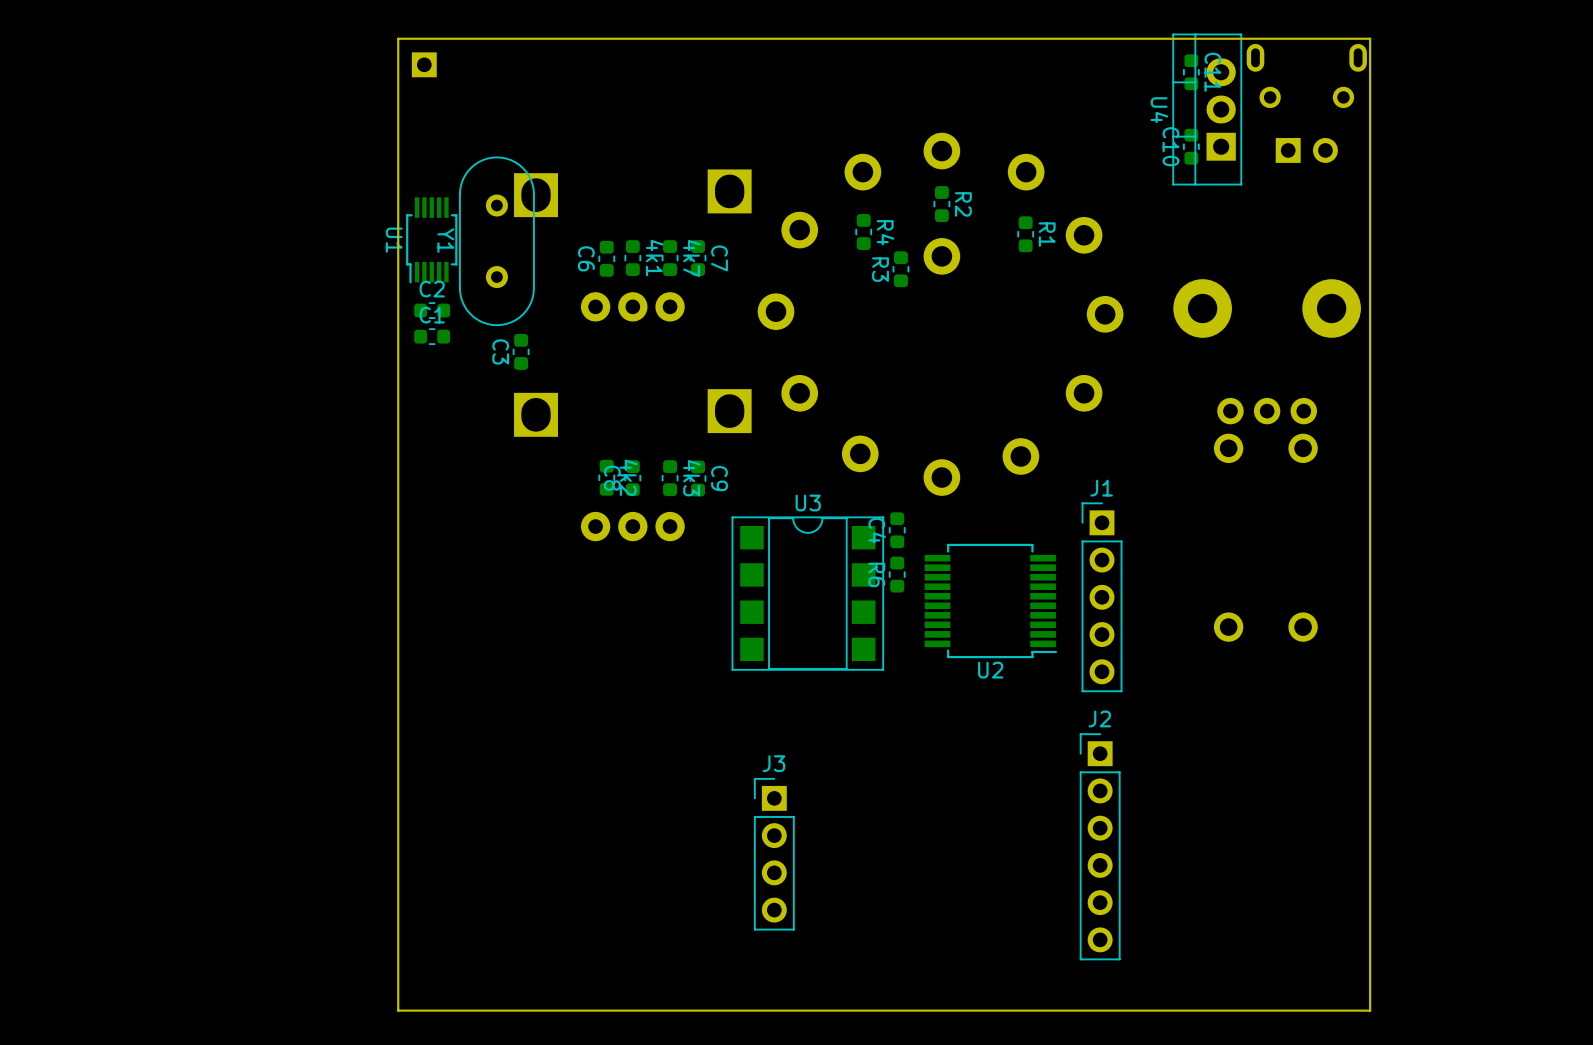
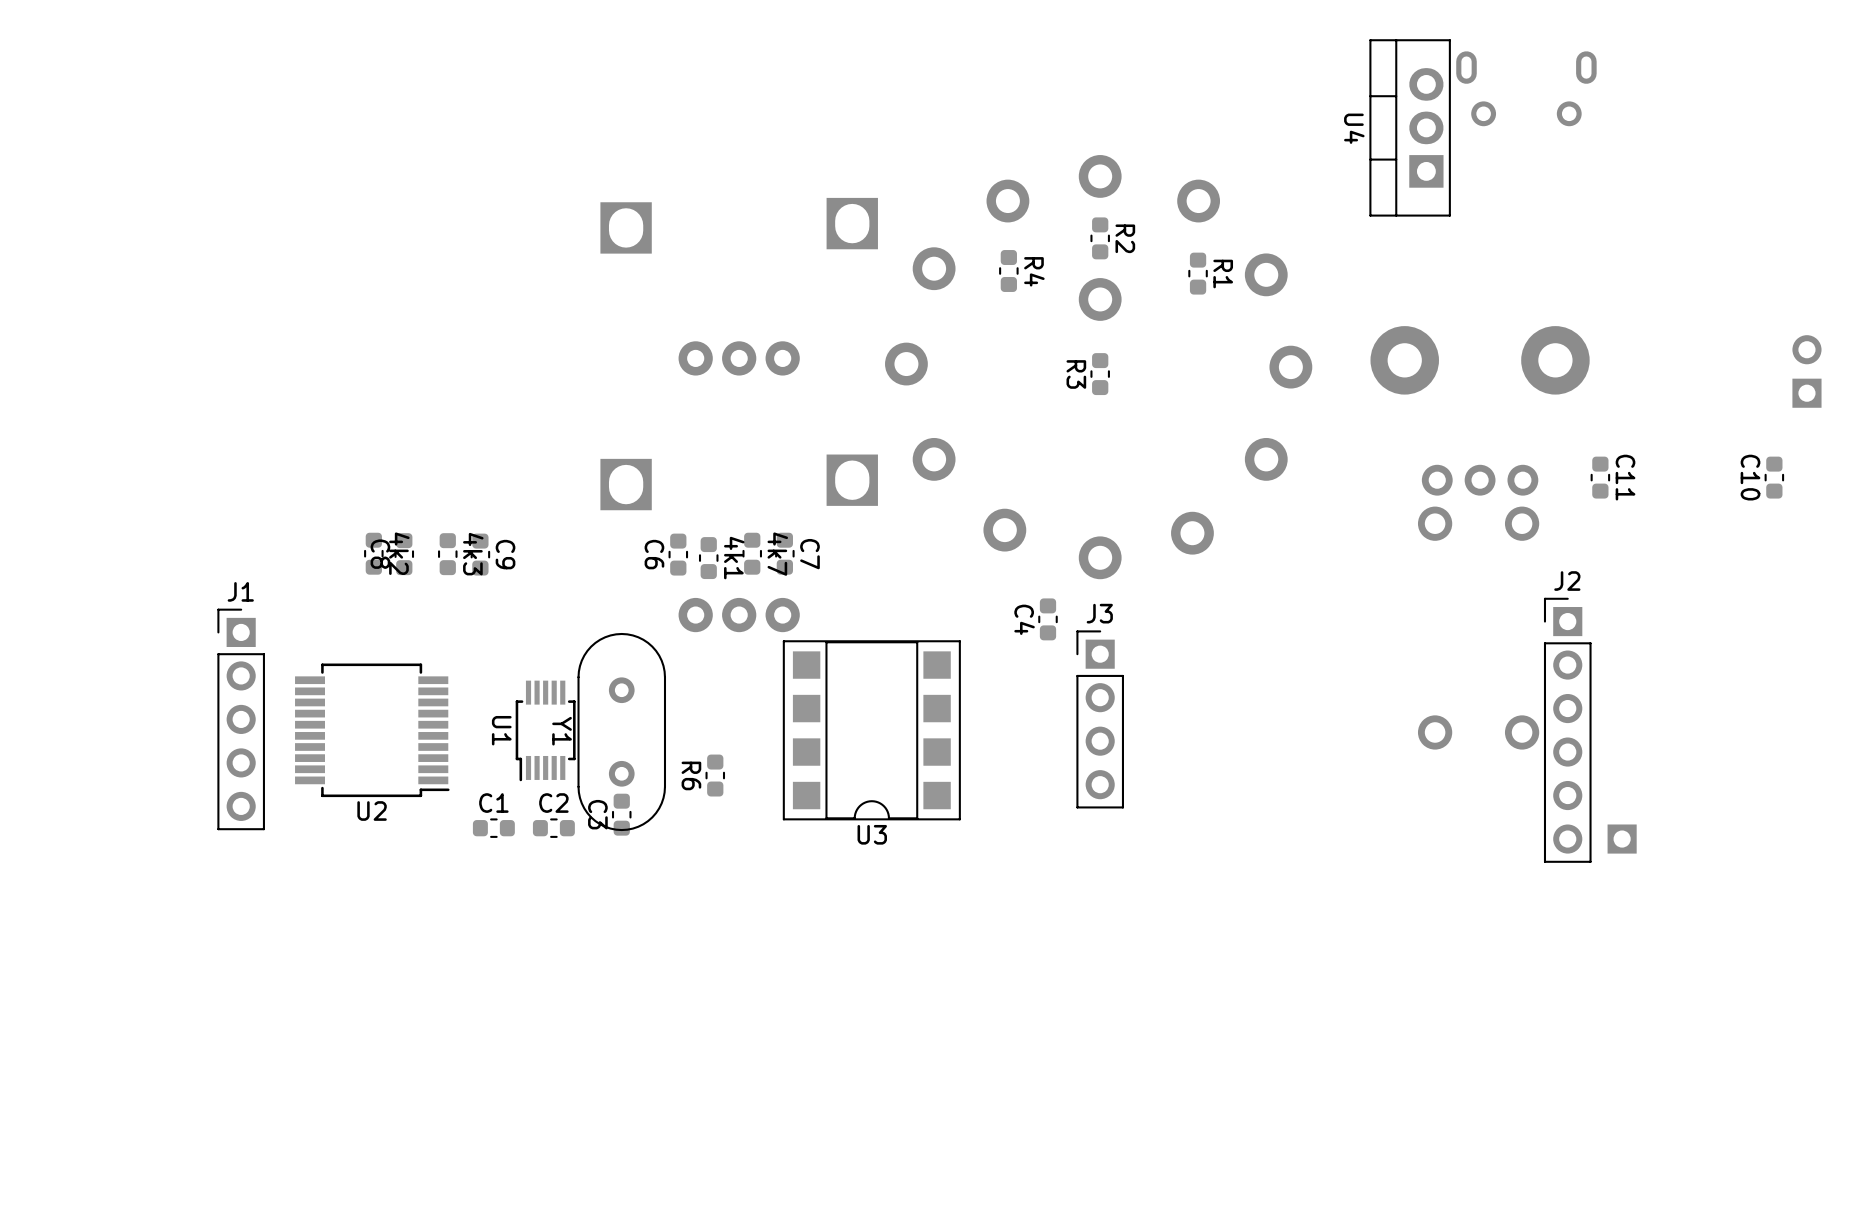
board edge: (1370, 38) (1370, 1010) (398, 1010) (398, 38) (1370, 38) -> none
part: (424, 64) -> none
C11 position: (1191, 72) -> (1600, 477)
C10 position: (1191, 146) -> (1774, 477)
part rotation: 0° (1306, 150) -> 90° counterclockwise (1806, 371)
part position: (1306, 150) -> (1806, 371)
U1 position: (431, 240) -> (545, 730)
Y1 position: (496, 241) -> (621, 732)
C6 position: (606, 258) -> (678, 554)
4k1: (632, 258) -> none
4k7 position: (670, 258) -> (752, 553)
C7 position: (698, 258) -> (784, 553)
R3 position: (900, 269) -> (1100, 374)
C2 position: (432, 310) -> (553, 828)
C1 position: (432, 336) -> (493, 828)
C3 position: (521, 351) -> (621, 814)
4k2: none -> (373, 553)
4k2 name: 4k2 (628, 477) -> 4k1 (734, 558)
C8 position: (632, 478) -> (404, 554)
4k3 position: (670, 478) -> (447, 554)
C9 position: (698, 478) -> (480, 554)
R6 position: (897, 574) -> (715, 775)
U3 rotation: 0° (807, 593) -> 180° (871, 730)
J1 position: (1102, 597) -> (241, 719)
U2 position: (990, 601) -> (372, 730)
part: none -> (1622, 839)
J2 position: (1100, 846) -> (1567, 730)
J3 position: (774, 854) -> (1100, 719)

